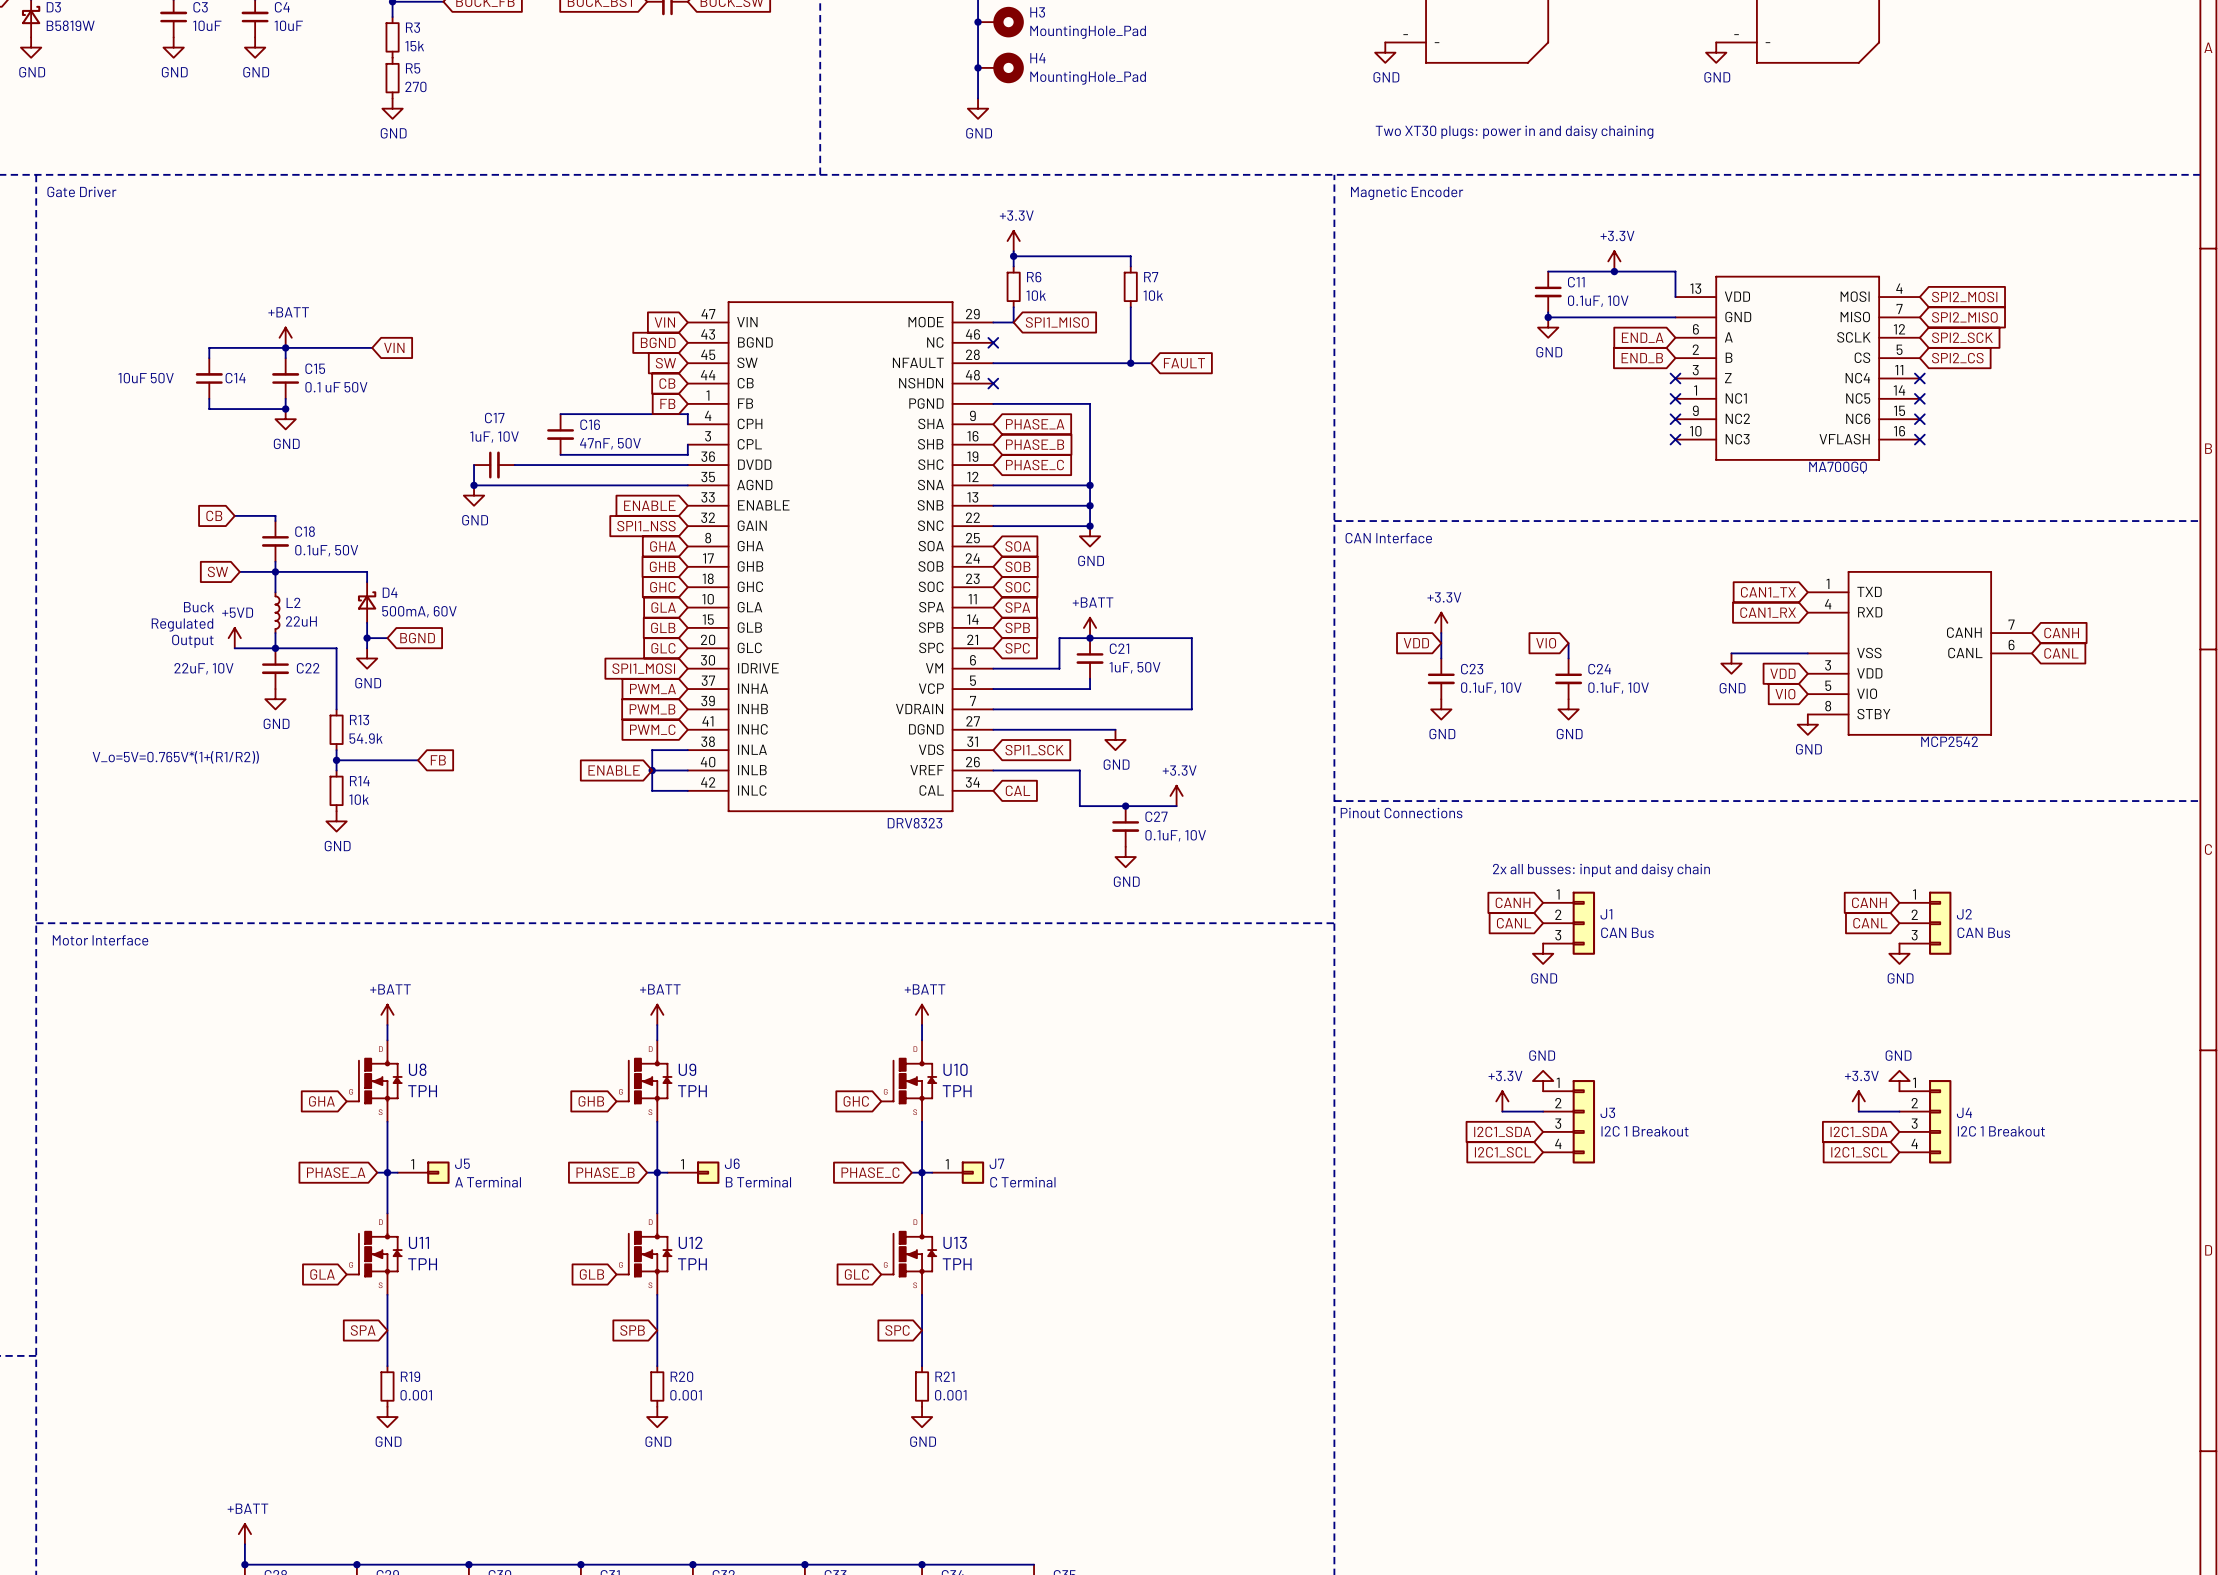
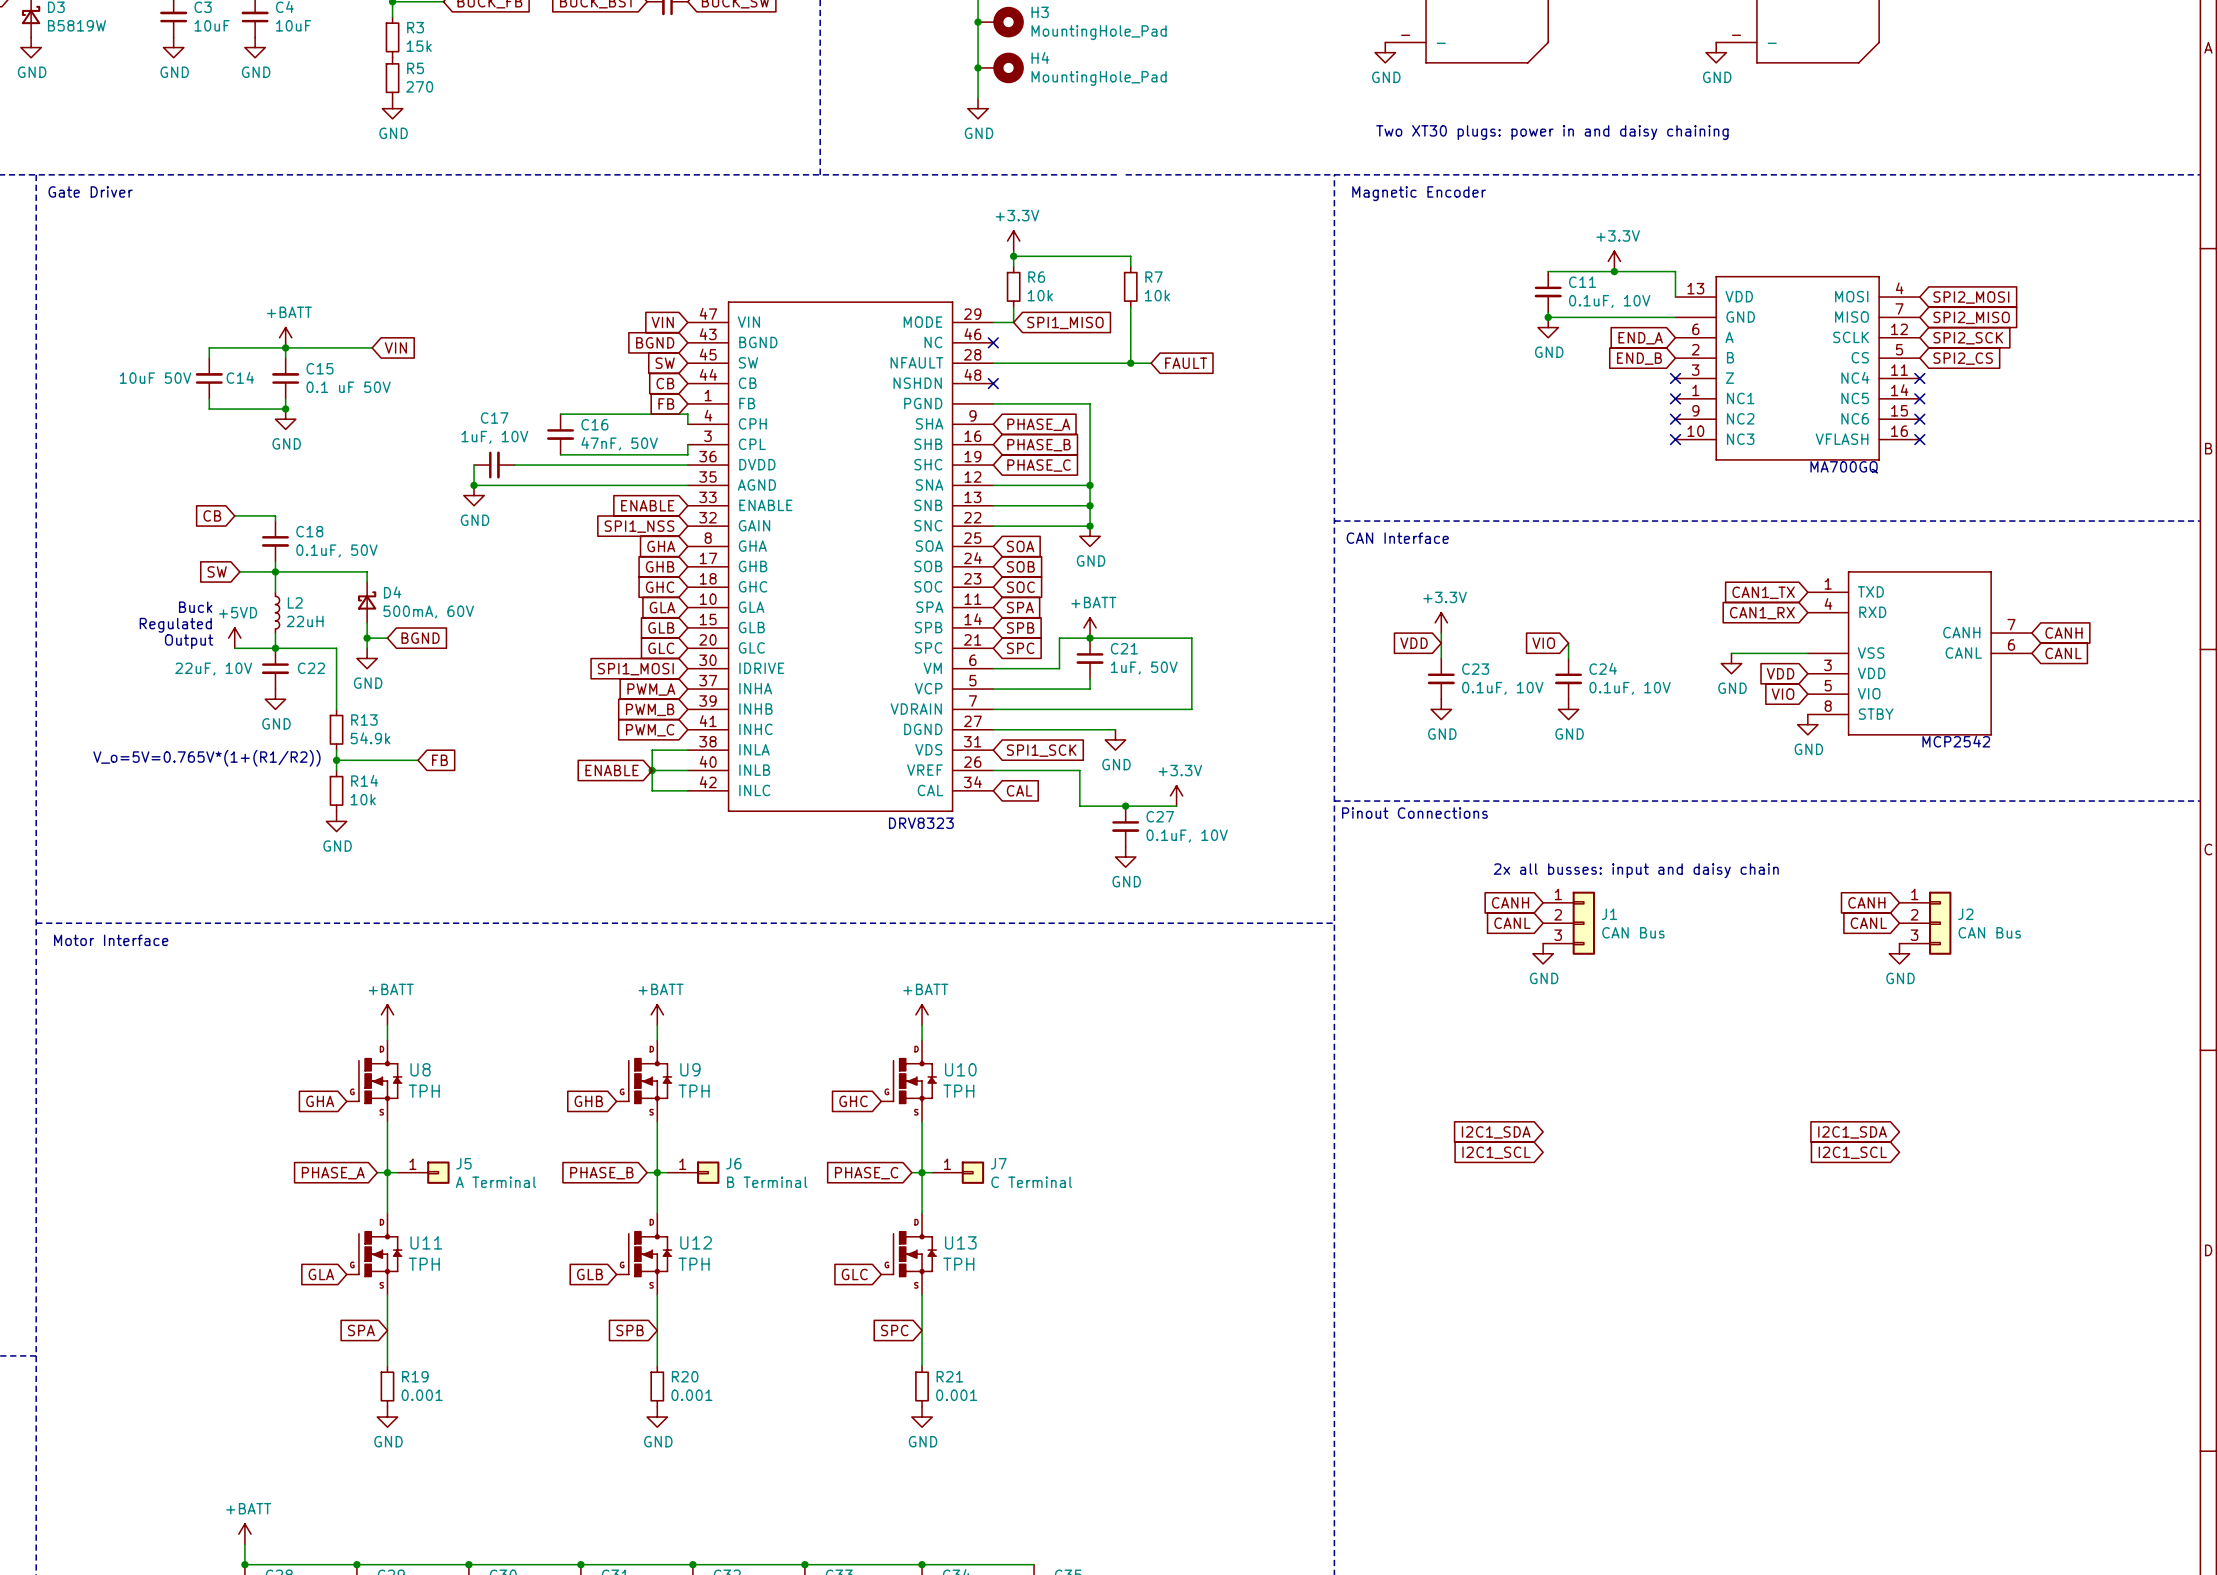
power symbol: GND (1543, 1081) -> none
power symbol: GND (1899, 1081) -> none
power symbol: +3.3V (1502, 1101) -> none
power symbol: +3.3V (1858, 1101) -> none
wire: (1502, 1111) (1543, 1111) -> none
wire: (1858, 1111) (1899, 1111) -> none
J3: I2C 1 Breakout (1569, 1121) -> none
J4: I2C 1 Breakout (1925, 1121) -> none

